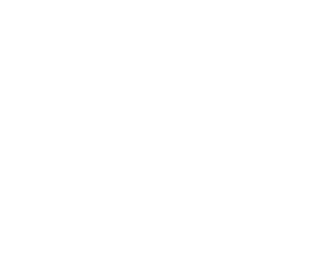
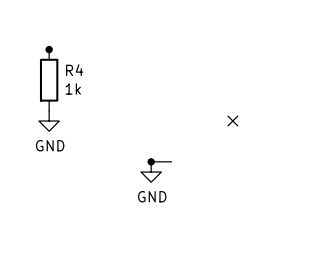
junction: none -> (49, 49)
R4: none -> 1k (49, 80)
power symbol: none -> GND (49, 121)
no-connect mark: none -> (232, 121)
wire: none -> (151, 161) (171, 161)
junction: none -> (151, 161)
power symbol: none -> GND (151, 172)

